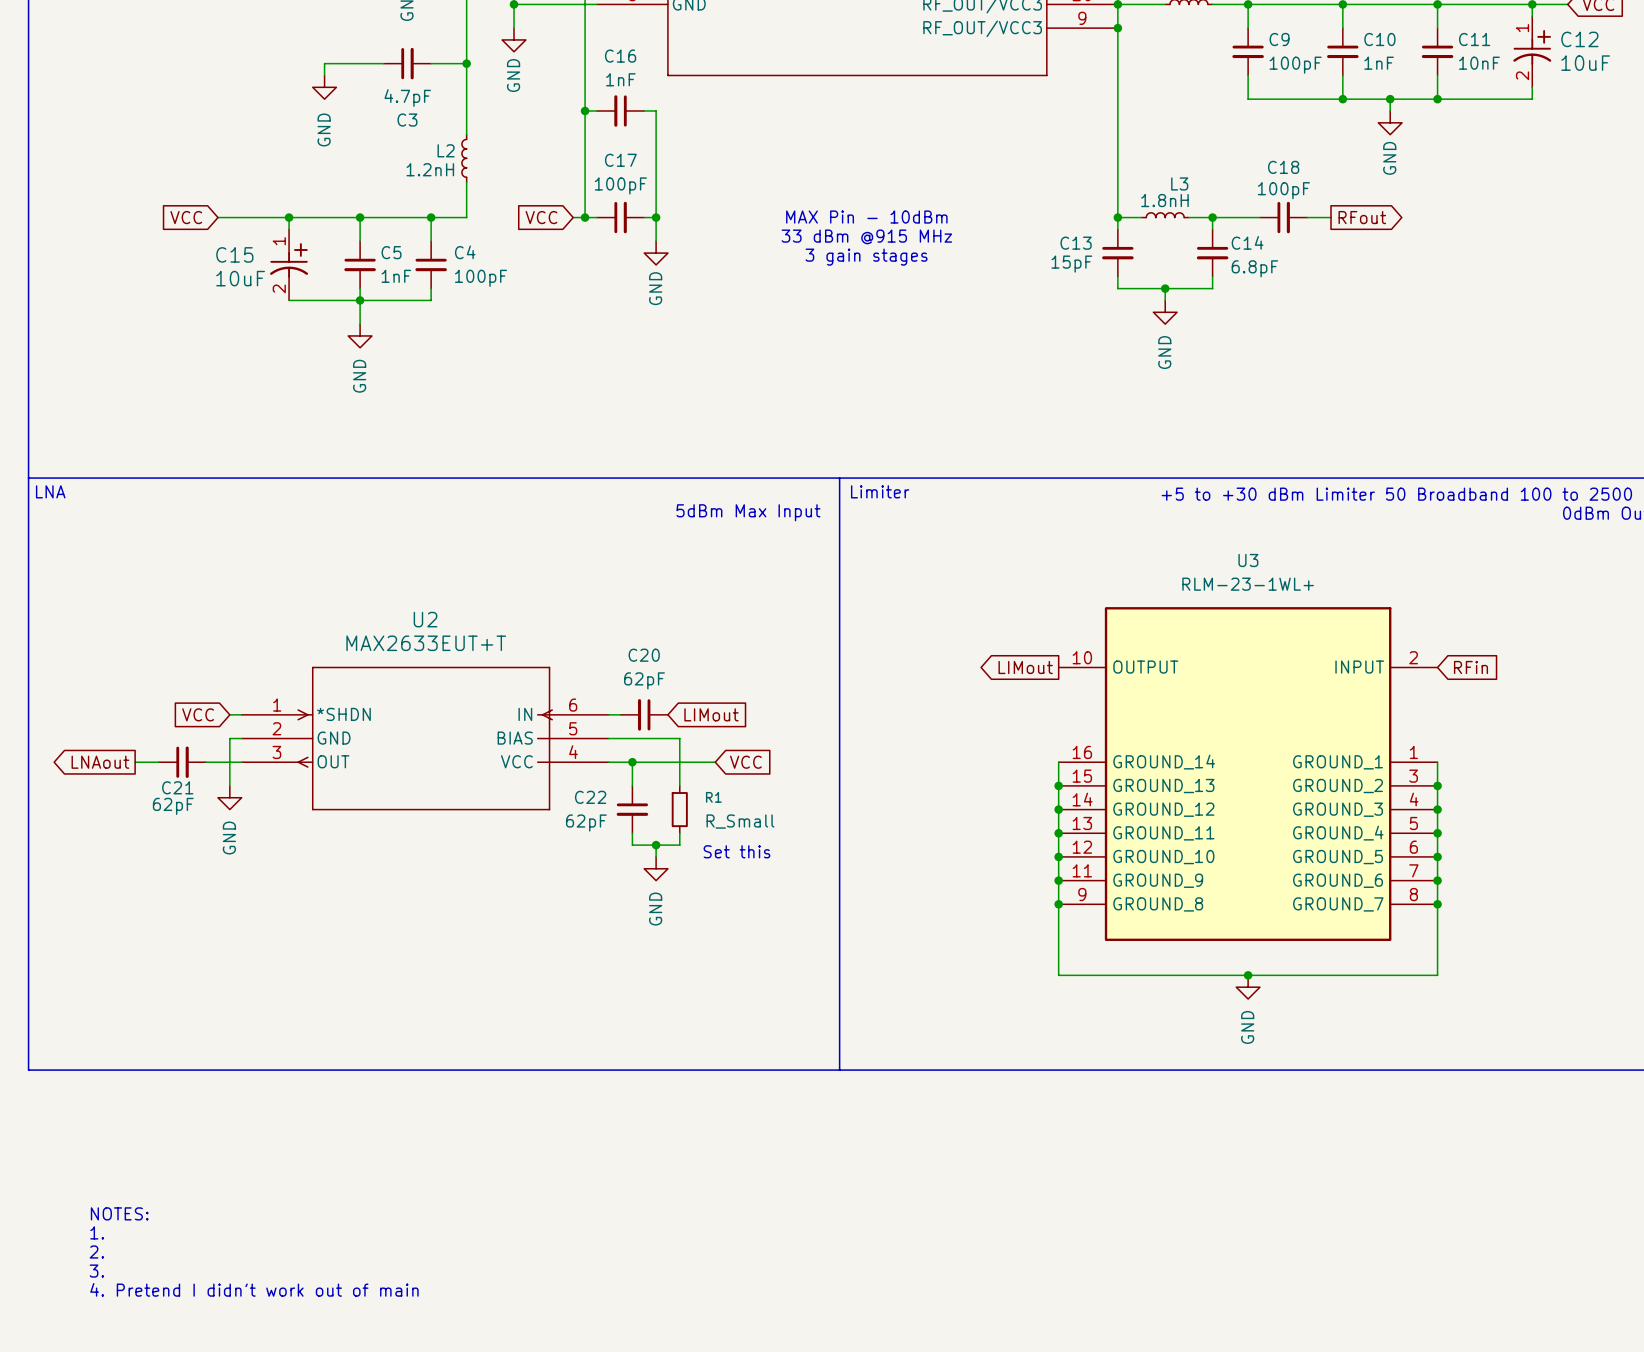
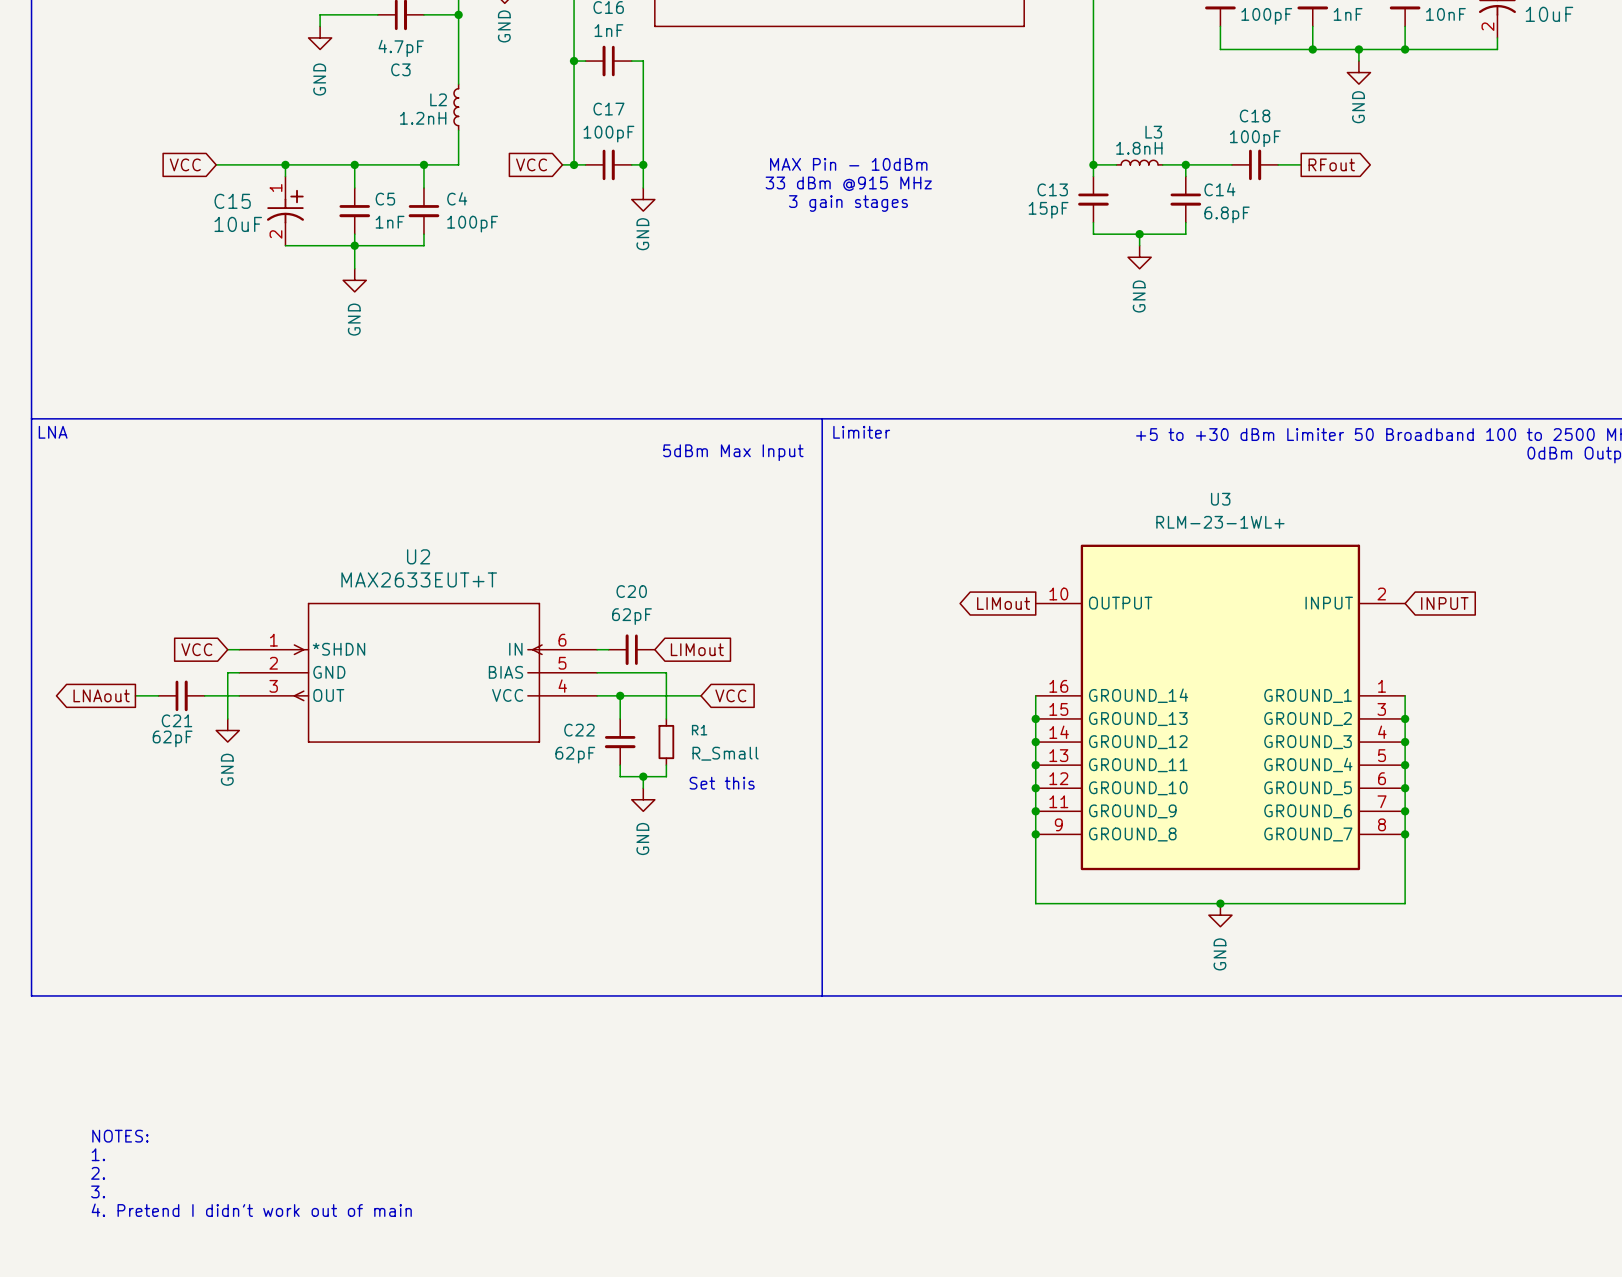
global label: RFin (1470, 667) -> INPUT (1444, 603)

